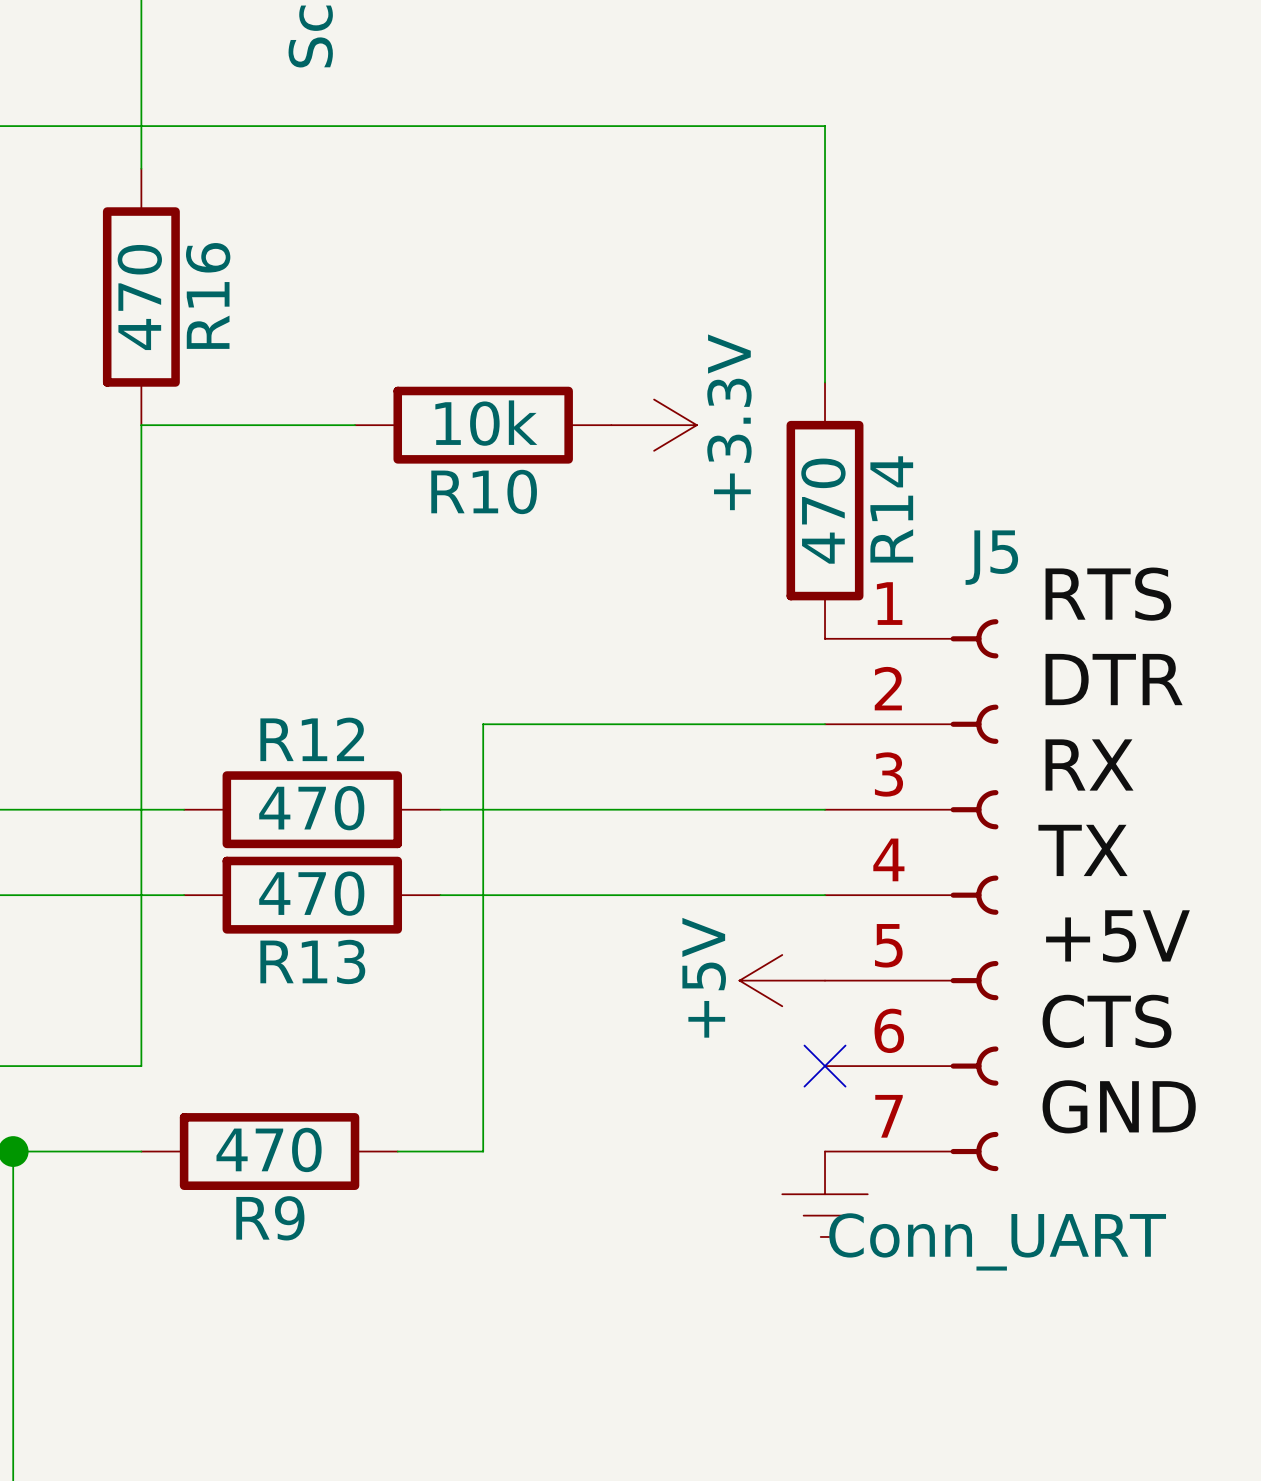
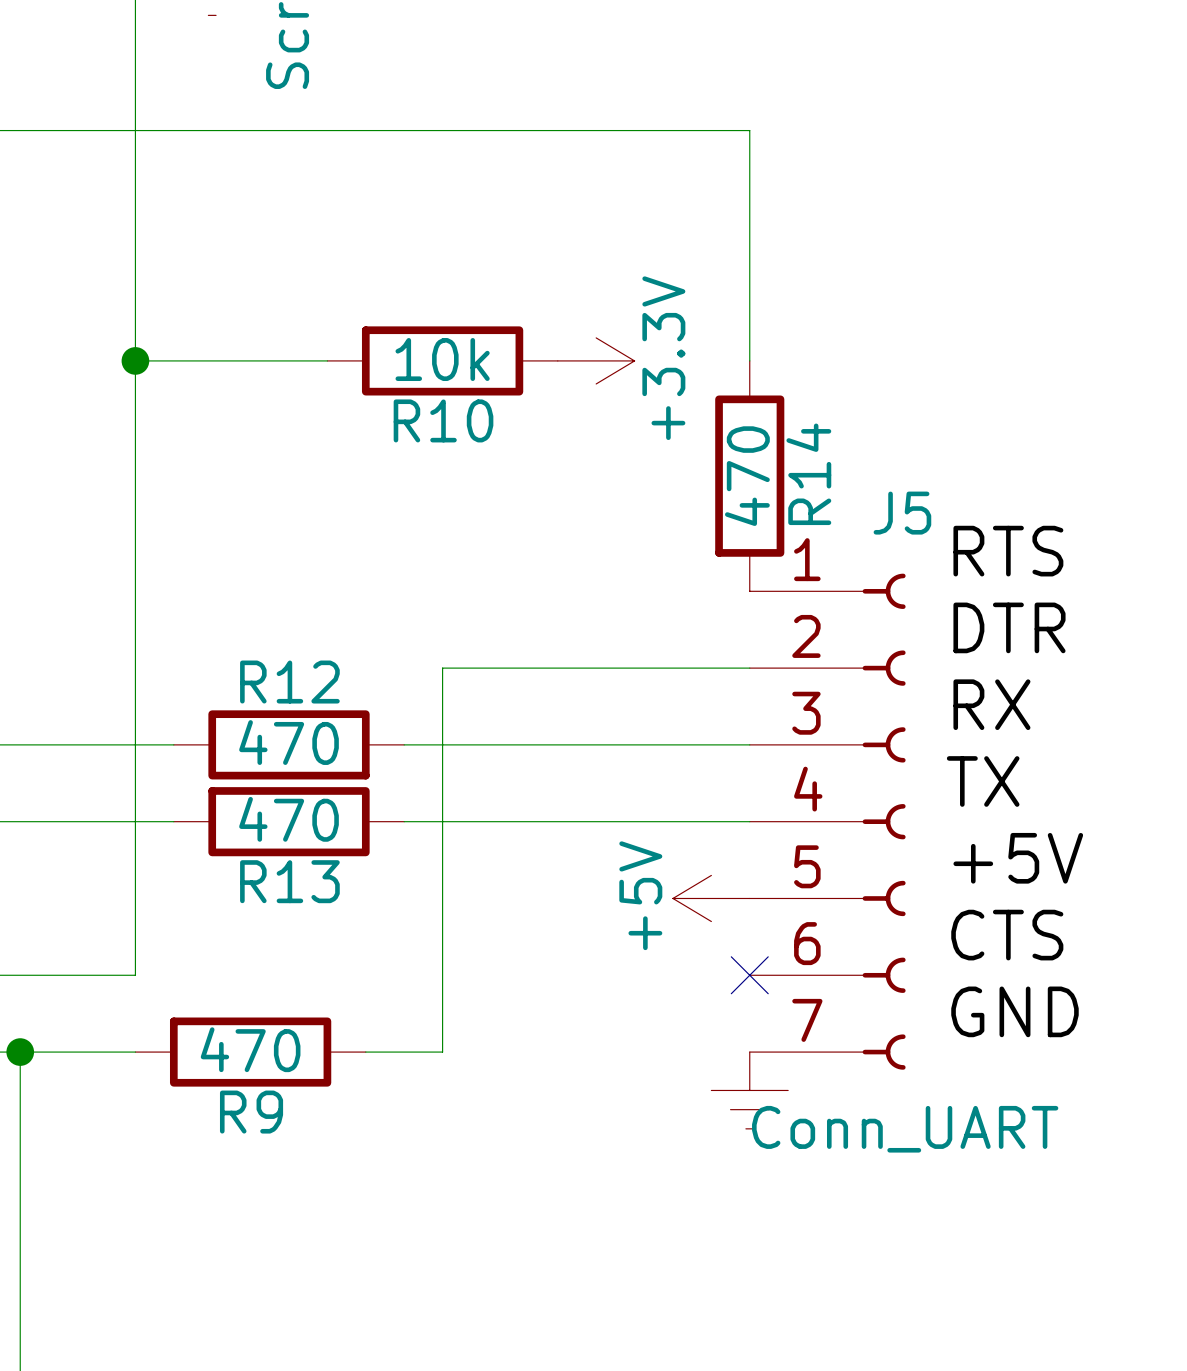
R16: 470 (141, 296) -> none
wire: none -> (135, 360) (327, 360)
junction: none -> (135, 360)
wire: (141, 425) (355, 425) -> (135, 399) (135, 168)
R10 position: (483, 425) -> (442, 360)
power symbol position: +3.3V (654, 425) -> +3.3V (596, 360)

